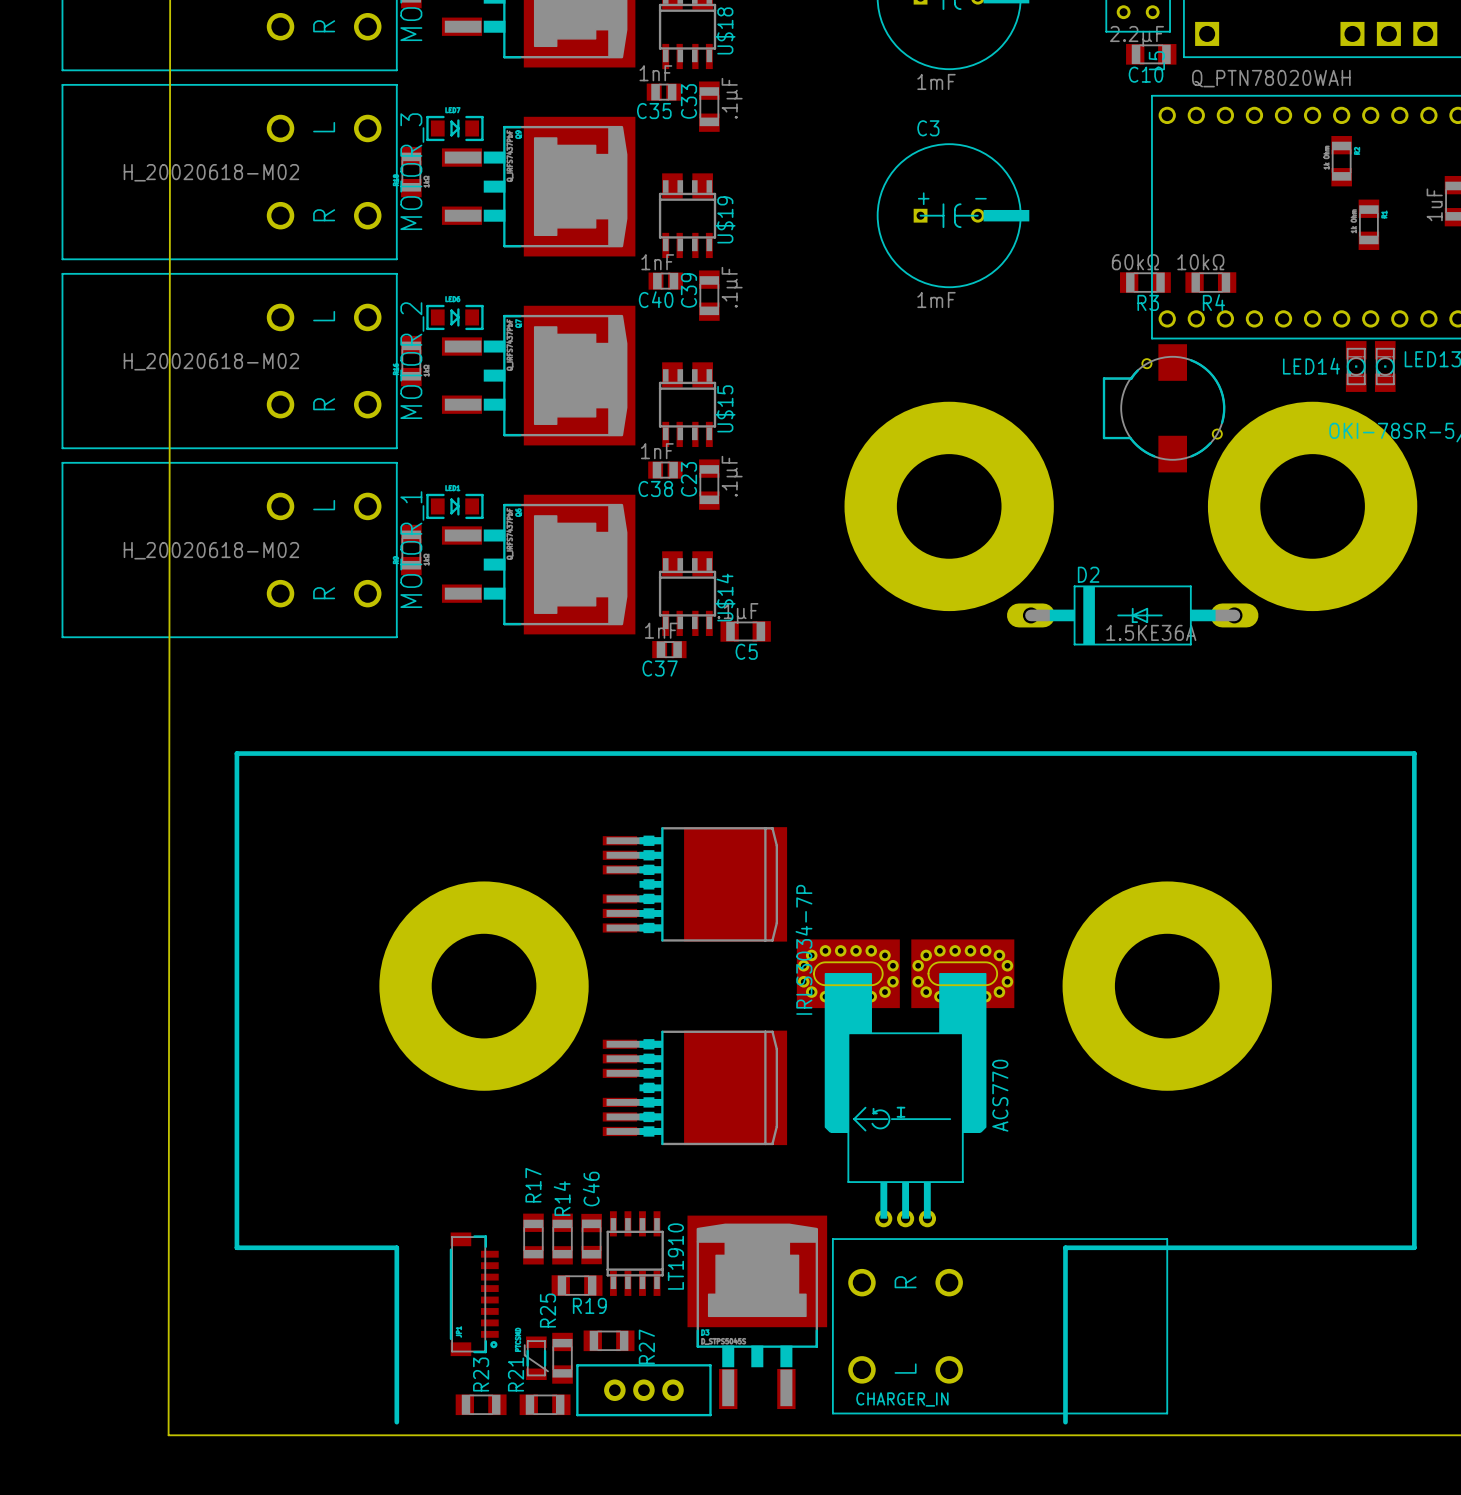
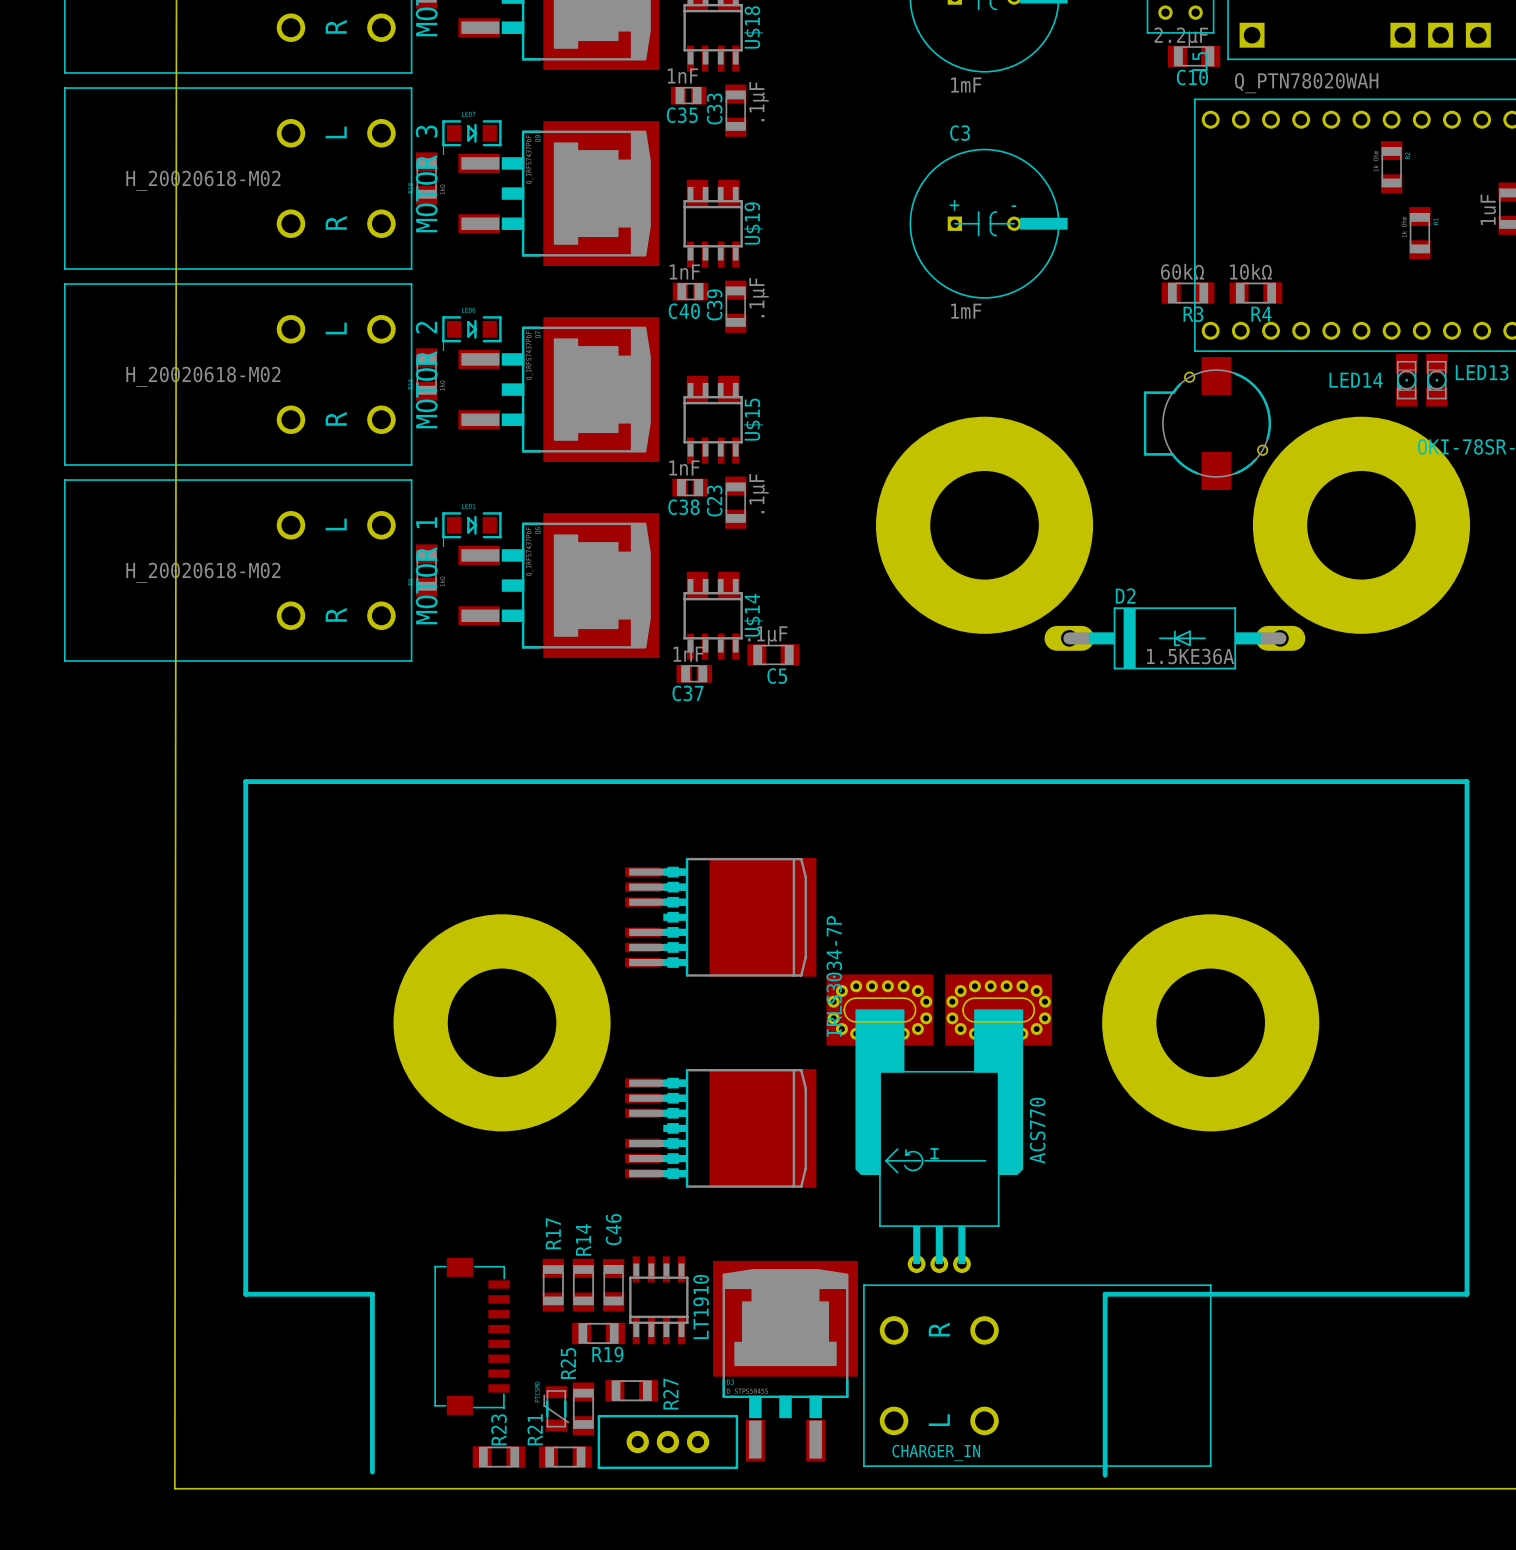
line: (359, 1247) (396, 1247) (396, 1422) -> (372, 1294) (372, 1472)
part: none -> (472, 1336)
part: (474, 1294) -> none

